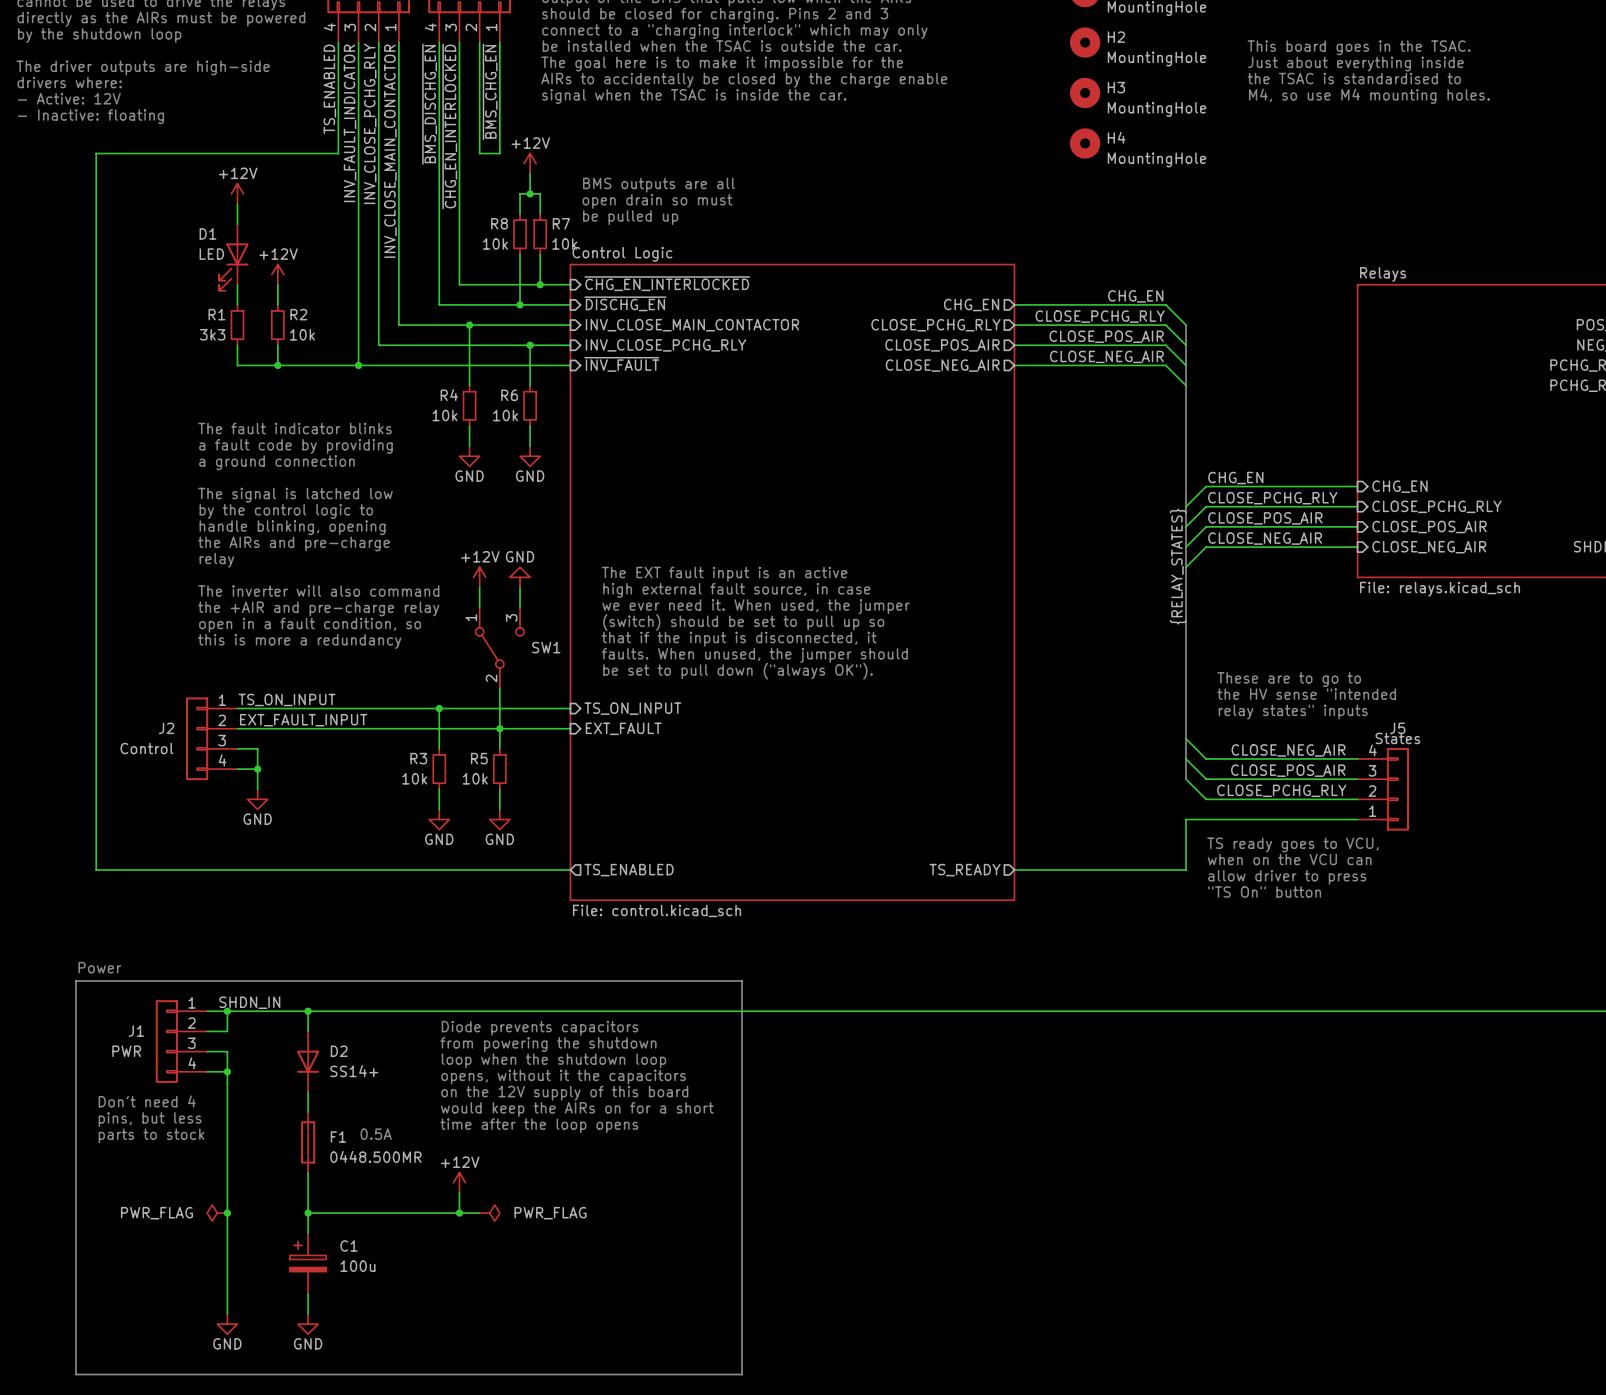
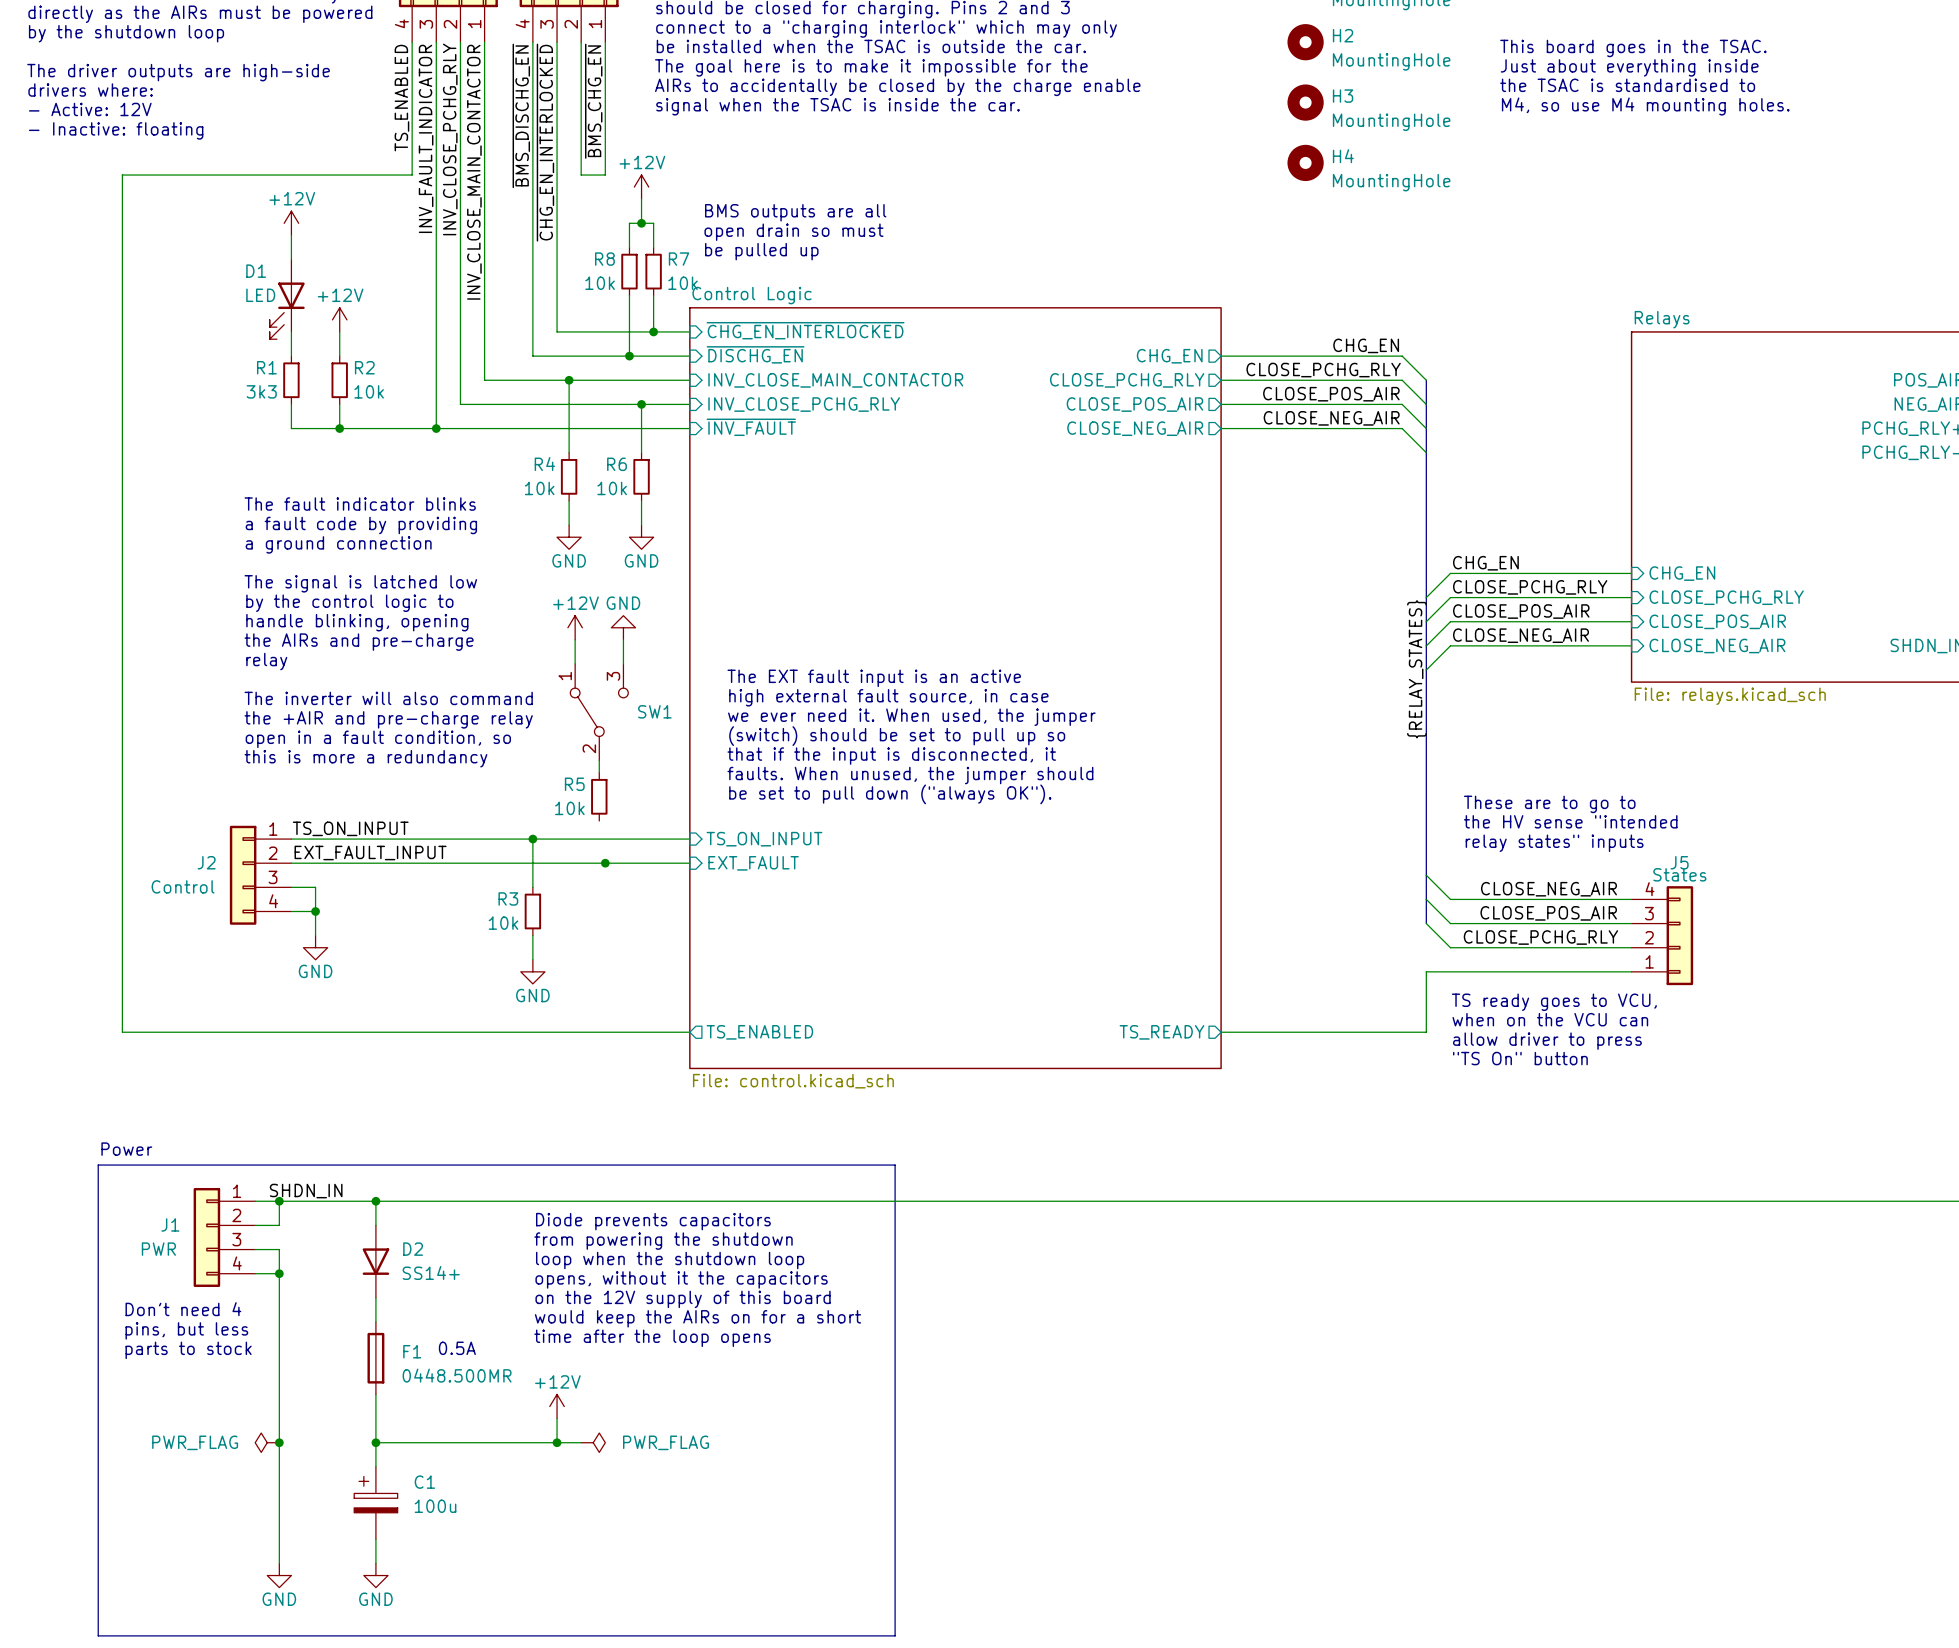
power symbol position: +12V (479, 577) -> +12V (575, 627)
power symbol position: GND (520, 577) -> GND (623, 627)
wire: (479, 587) (479, 607) -> (575, 639) (575, 663)
wire: (520, 587) (520, 607) -> (623, 639) (623, 663)
wire: none -> (599, 760) (599, 772)
SW1 position: (499, 647) -> (599, 712)
wire: (499, 688) (499, 748) -> none
R5 position: (499, 769) -> (599, 796)
wire: (499, 789) (499, 809) -> none
power symbol: GND (499, 819) -> none

